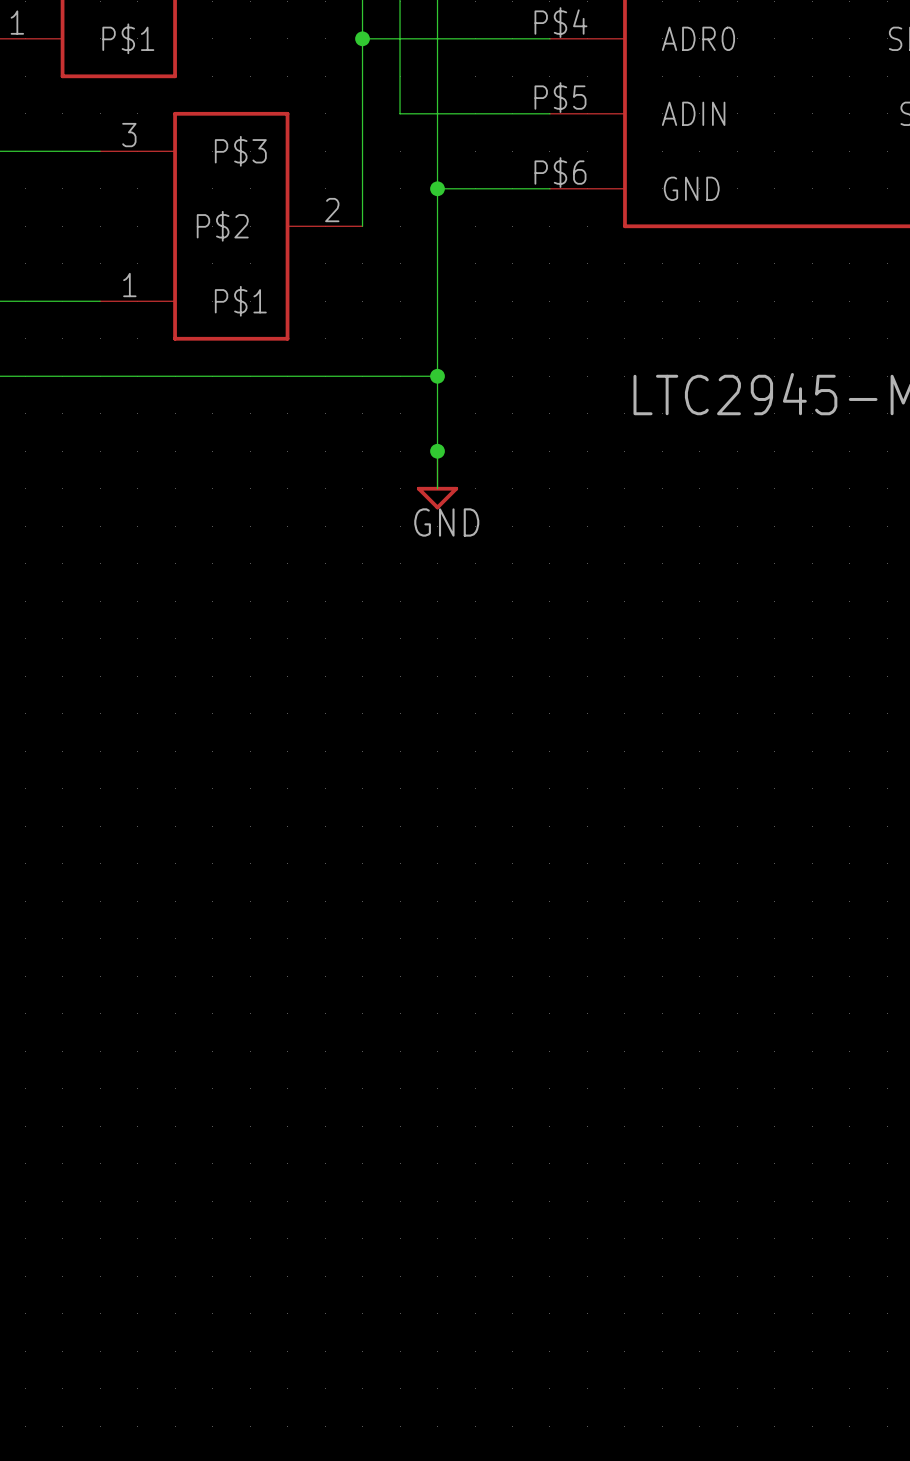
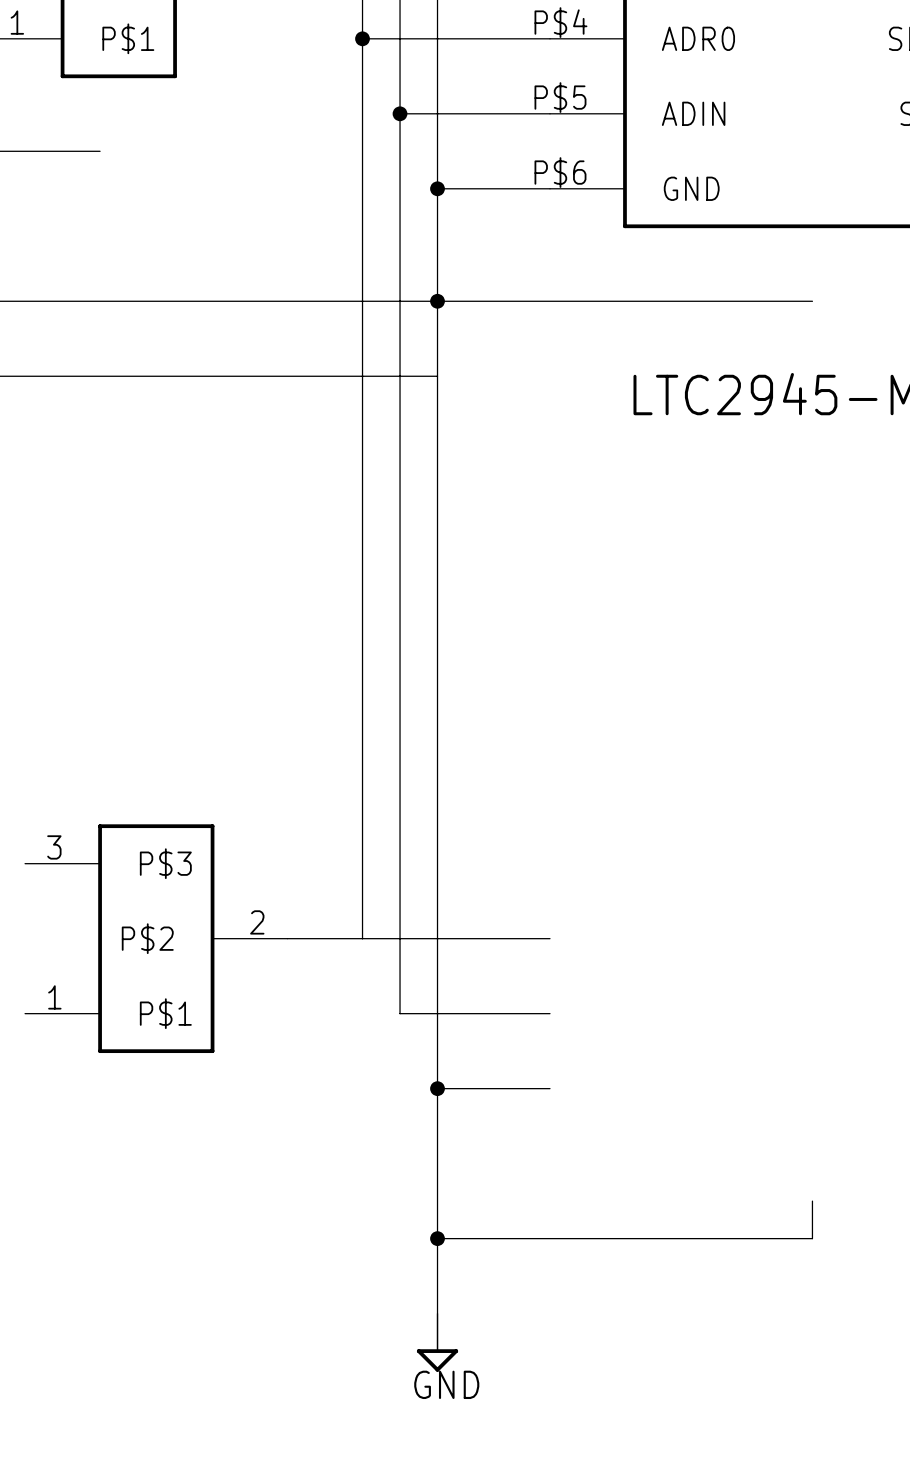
wire: none -> (400, 113) (400, 1013) (549, 1013)
junction: none -> (400, 113)
part: (231, 226) -> none
wire: none -> (362, 226) (362, 938)
wire: none -> (100, 301) (812, 301)
junction: none -> (437, 301)
junction: (437, 376) -> none
junction: (437, 451) -> none
power symbol: GND (437, 480) -> none
wire: none -> (437, 488) (437, 1351)
part: none -> (156, 938)
wire: none -> (287, 938) (549, 938)
wire: none -> (437, 1088) (549, 1088)
junction: none -> (437, 1088)
wire: none -> (812, 1201) (812, 1238) (437, 1238)
junction: none -> (437, 1238)
power symbol: none -> GND (437, 1342)

